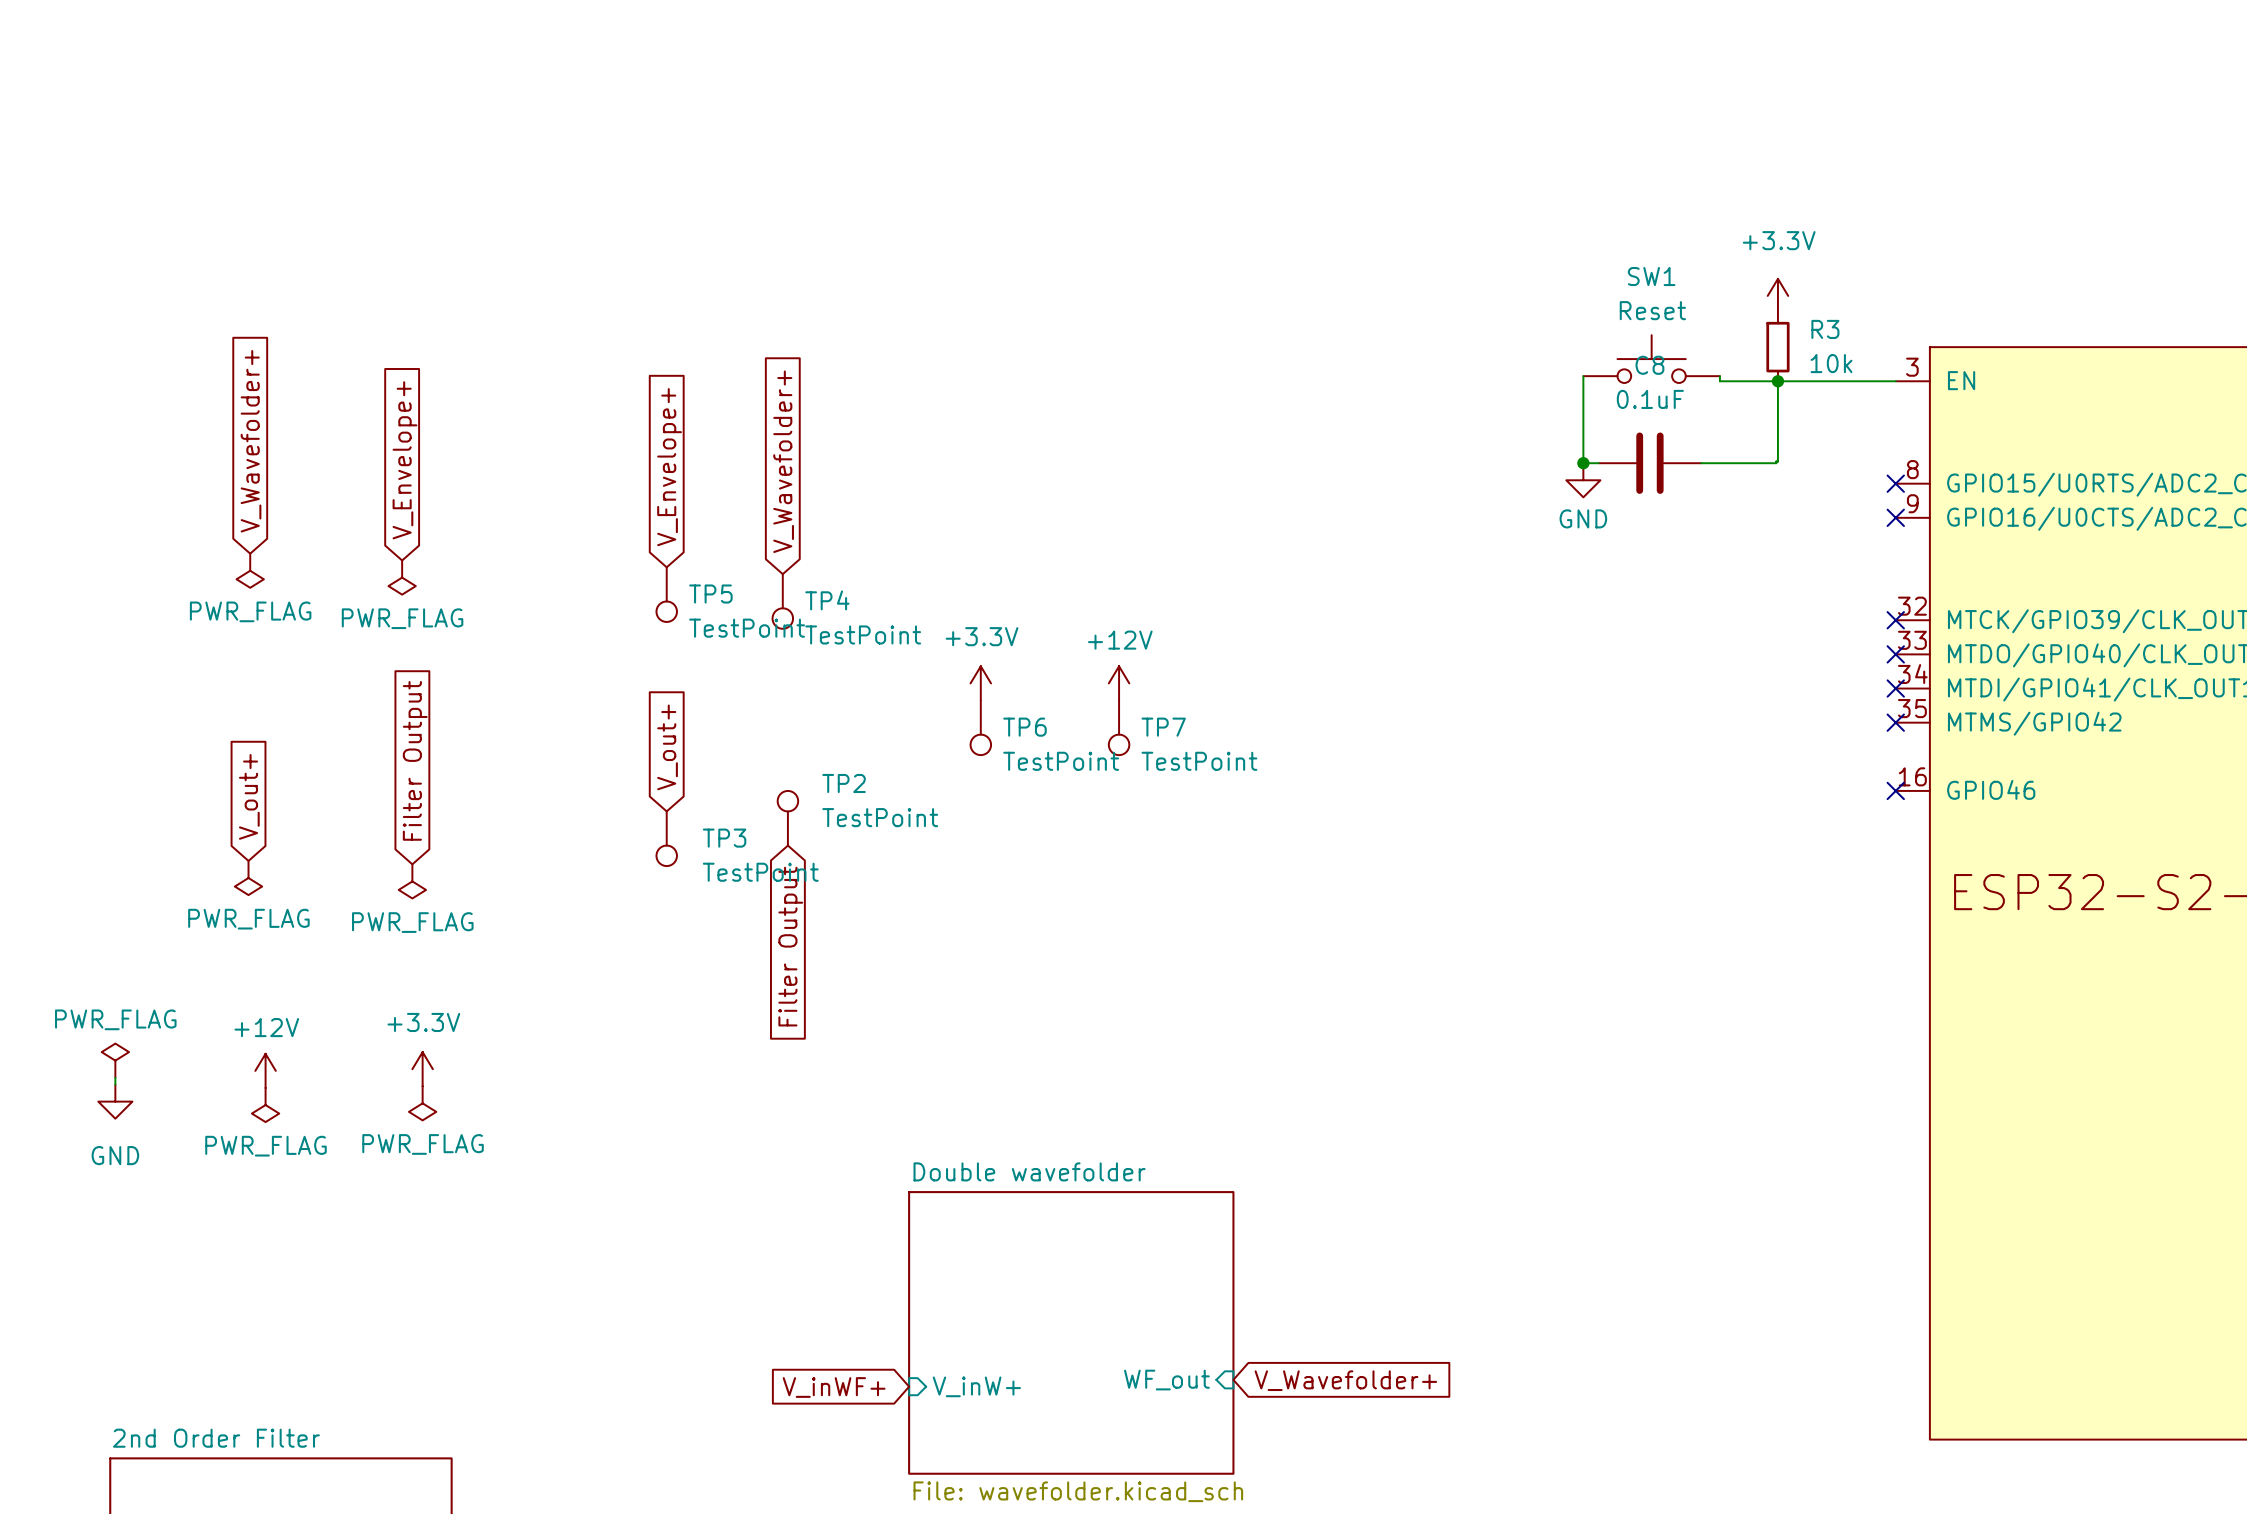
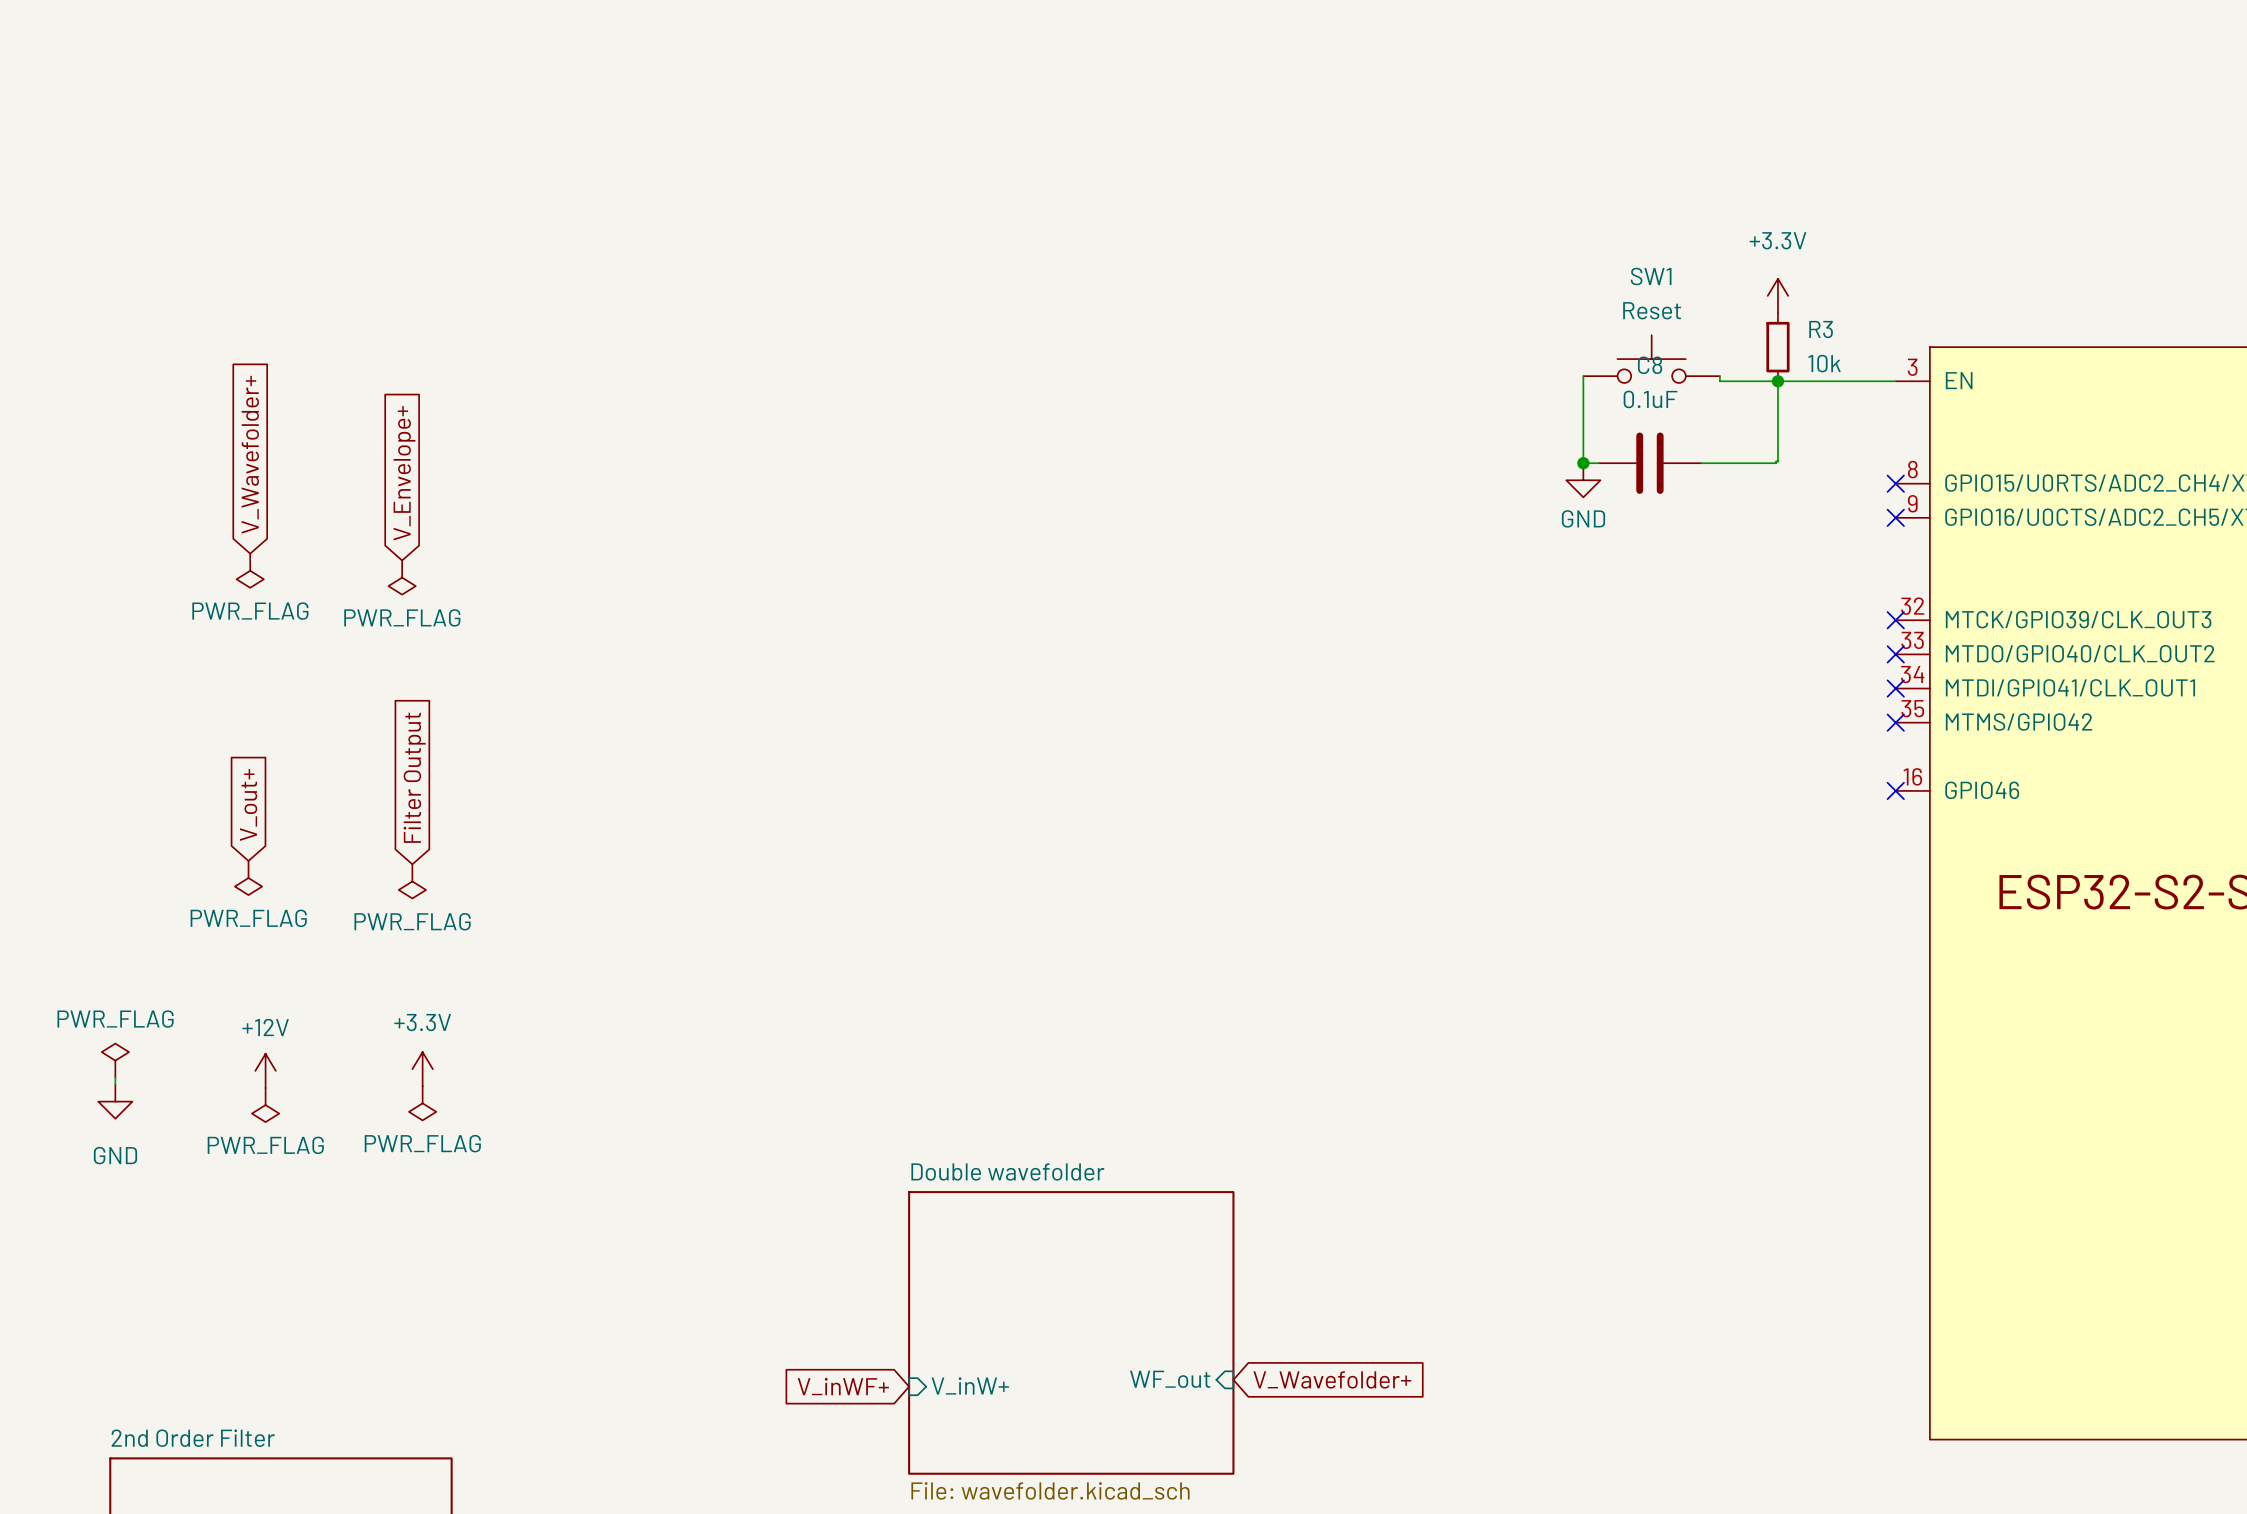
global label: V_Wavefolder+ (783, 461) -> none
global label: V_Envelope+ (669, 467) -> none
TP5: TestPoint (666, 594) -> none
TP4: TestPoint (782, 601) -> none
power symbol: +3.3V (980, 683) -> none
power symbol: +12V (1119, 683) -> none
TP6: TestPoint (980, 727) -> none
TP7: TestPoint (1119, 727) -> none
global label: V_out+ (667, 747) -> none
TP2: TestPoint (787, 818) -> none
TP3: TestPoint (666, 838) -> none
global label: Filter Output (790, 946) -> none

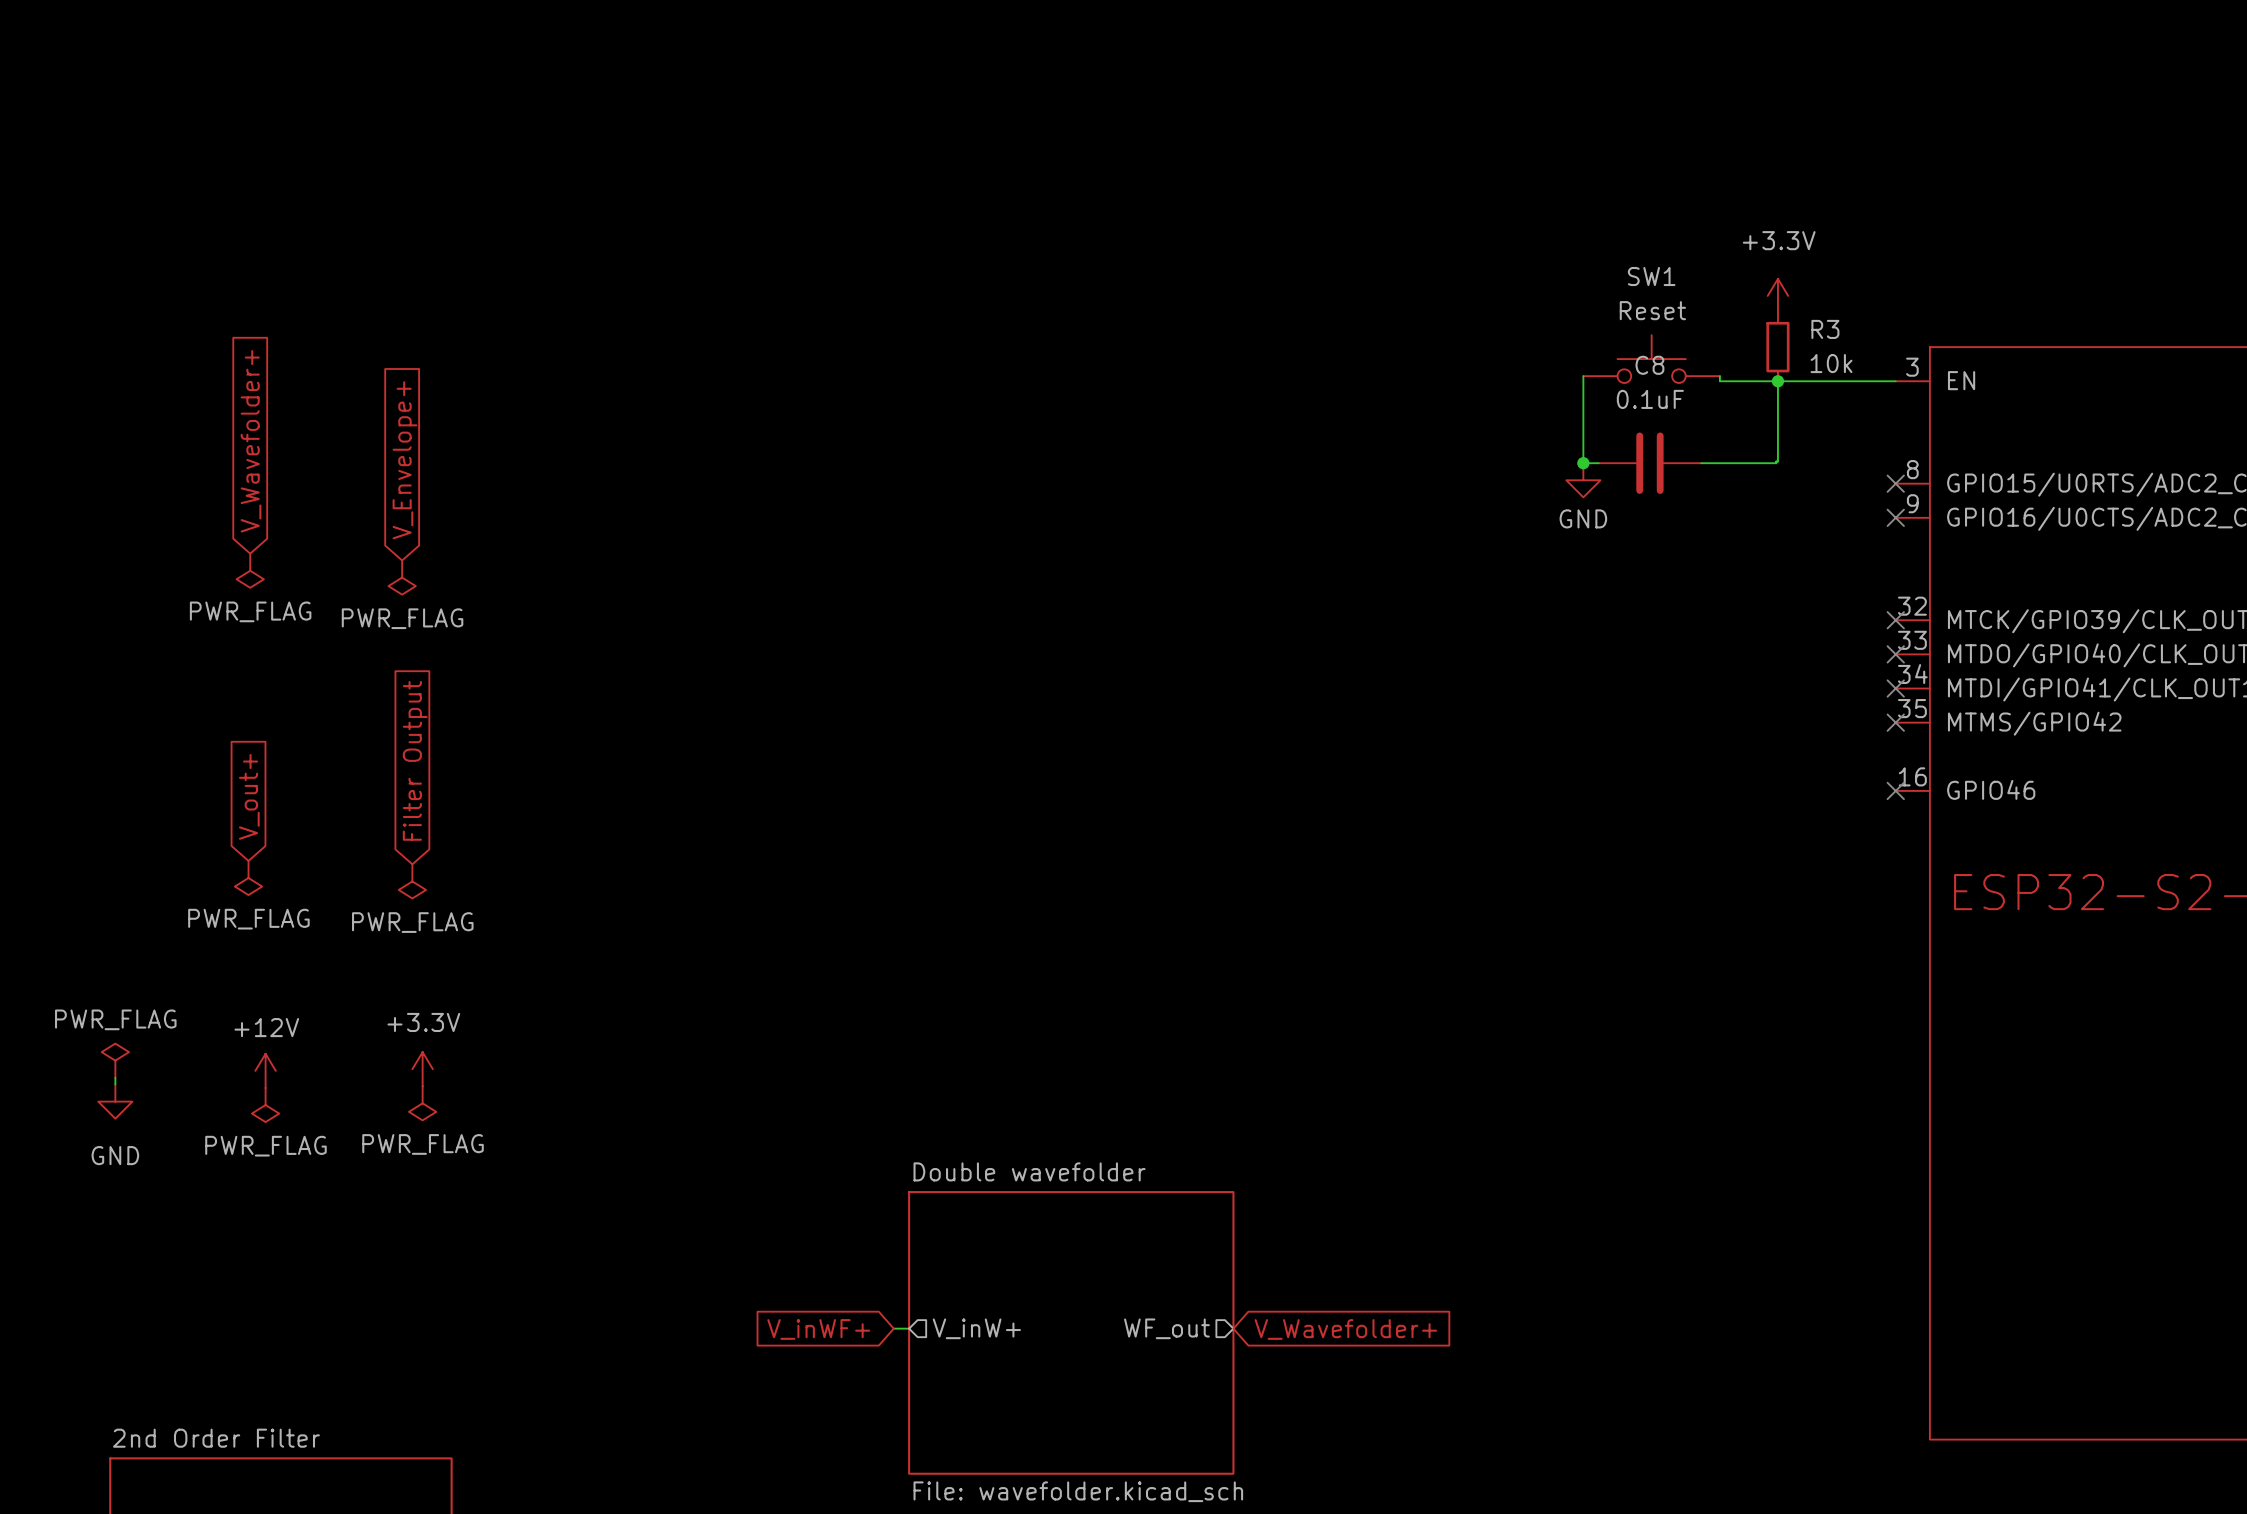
hierarchical label: none -> V_inW+ (976, 1328)
wire: none -> (893, 1328) (909, 1328)
hierarchical label: none -> WF_out (1166, 1328)
sheet pin: WF_out (1170, 1379) -> none
global label position: V_Wavefolder+ (1332, 1379) -> V_Wavefolder+ (1345, 1329)
sheet pin: V_inW+ (970, 1385) -> none
global label position: V_inWF+ (843, 1386) -> V_inWF+ (818, 1329)

